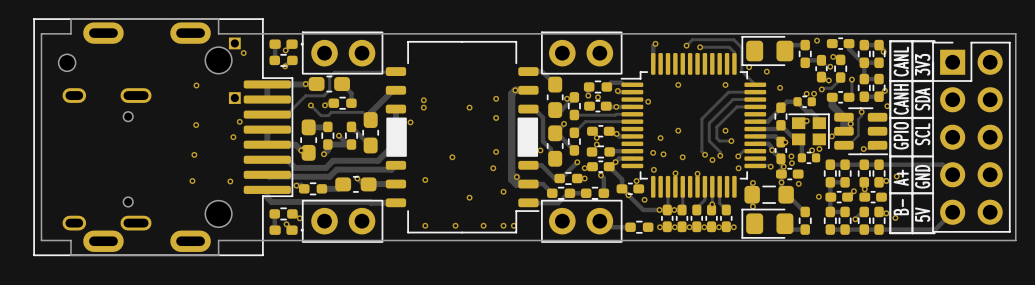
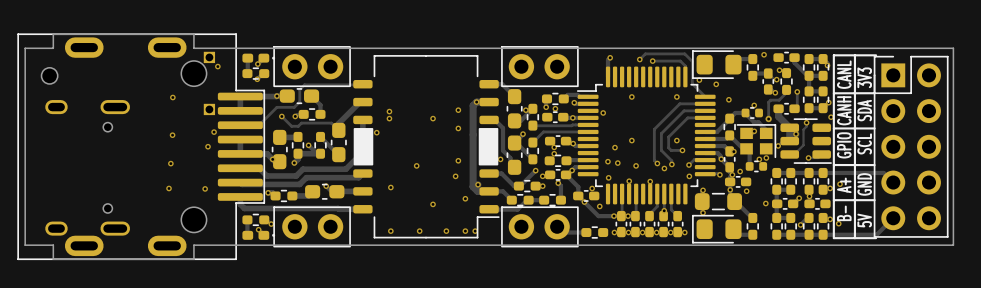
track: (840, 79) (831, 88) (821, 89) -> (786, 91) (779, 100) (770, 100) (768, 102) (768, 119)
via: (821, 89) -> none
via: (814, 93) -> none
via: none -> (768, 119)
via: (791, 156) -> none

